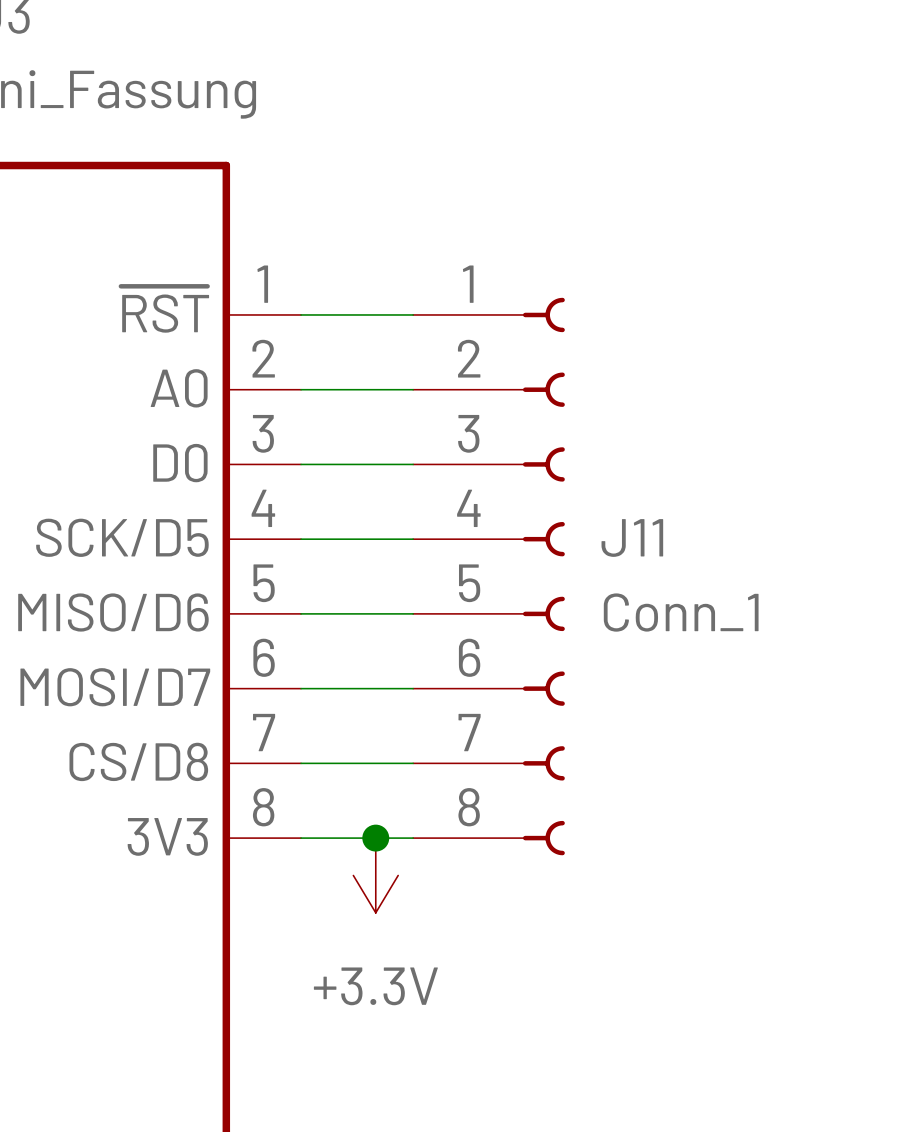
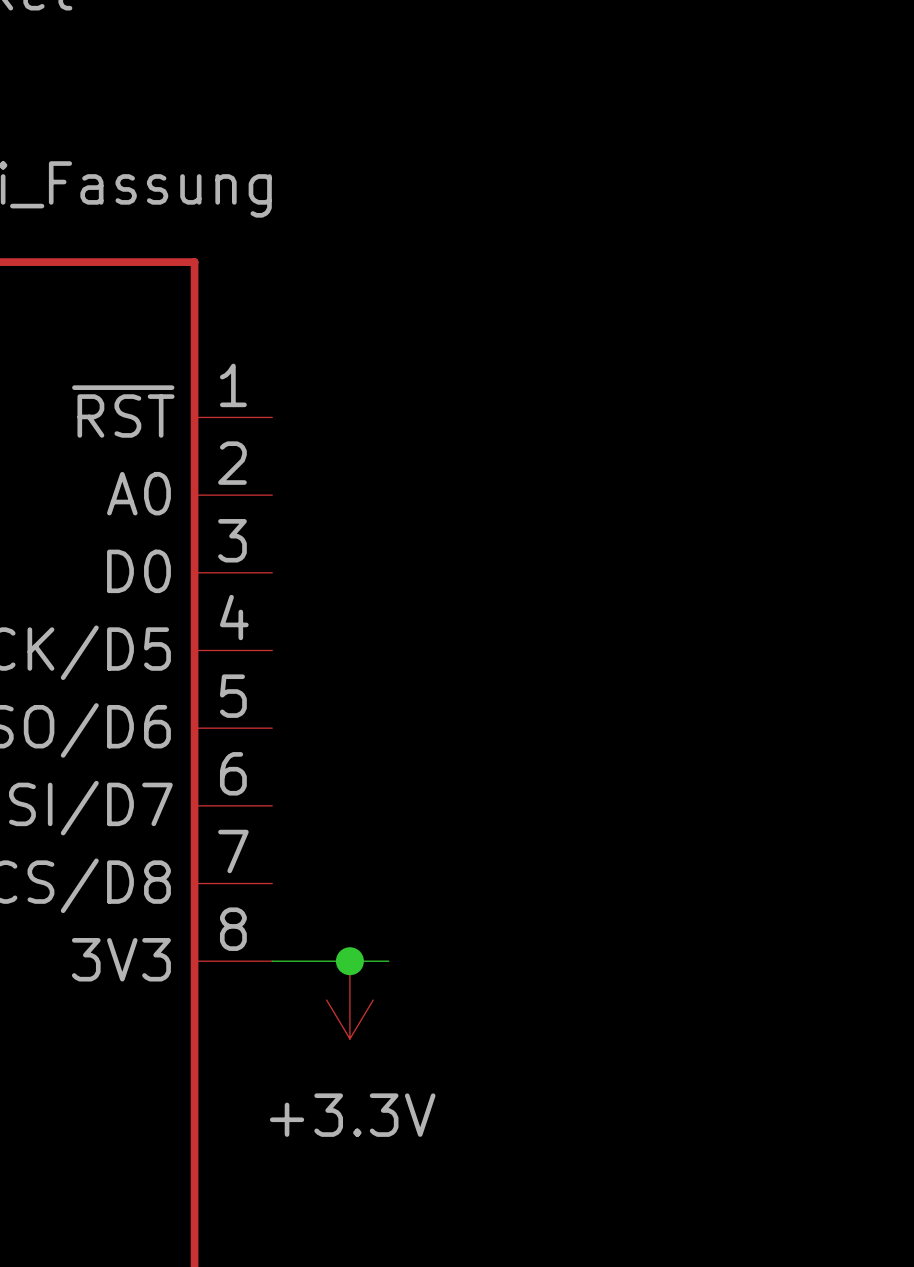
wire: (301, 314) (413, 314) -> none
wire: (301, 389) (413, 389) -> none
wire: (301, 464) (413, 464) -> none
wire: (301, 539) (413, 539) -> none
J11: Conn_1 (488, 576) -> none
wire: (301, 613) (413, 613) -> none
wire: (301, 688) (413, 688) -> none
wire: (301, 763) (413, 763) -> none

